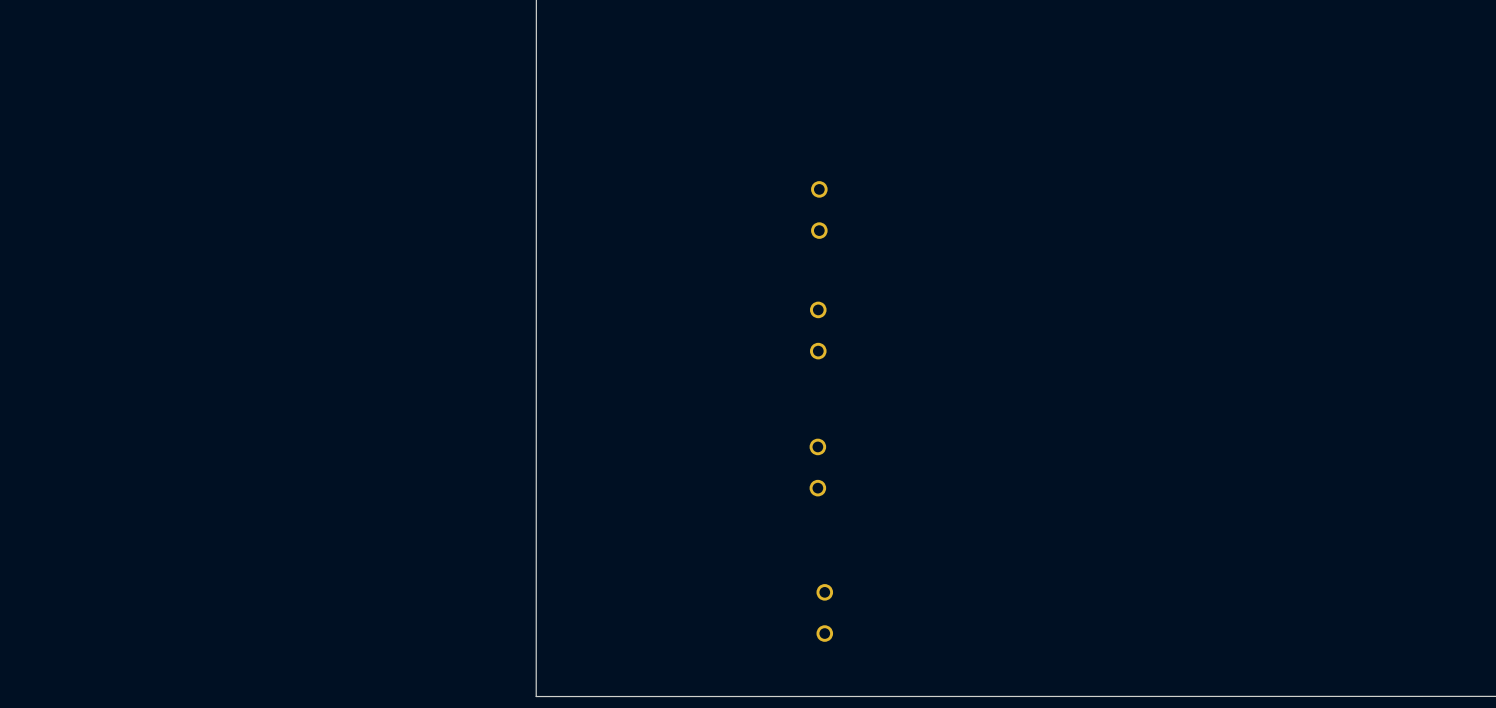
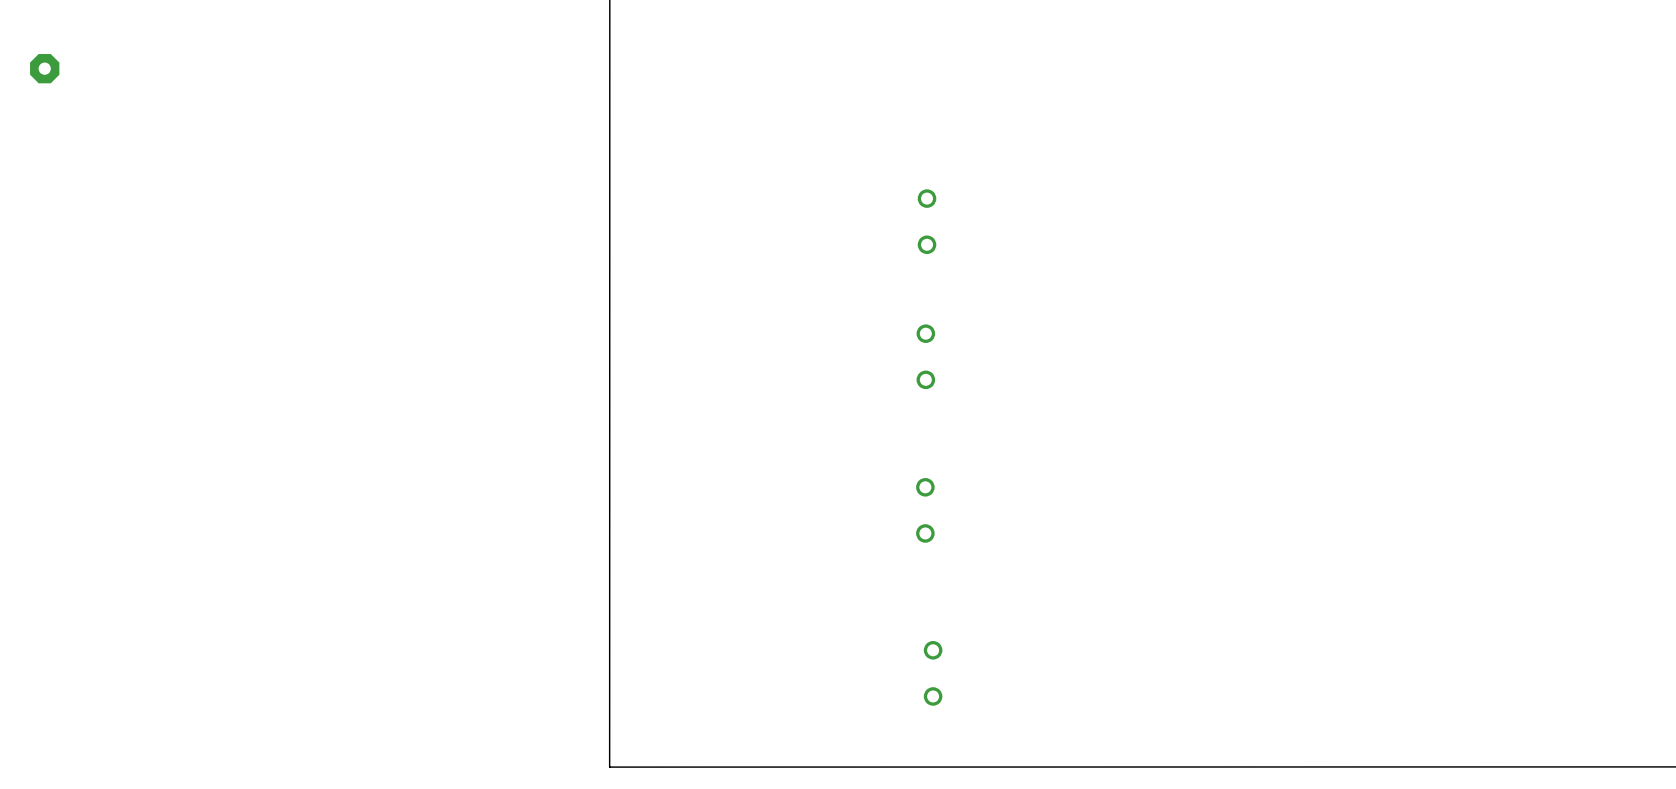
part: none -> (44, 68)

